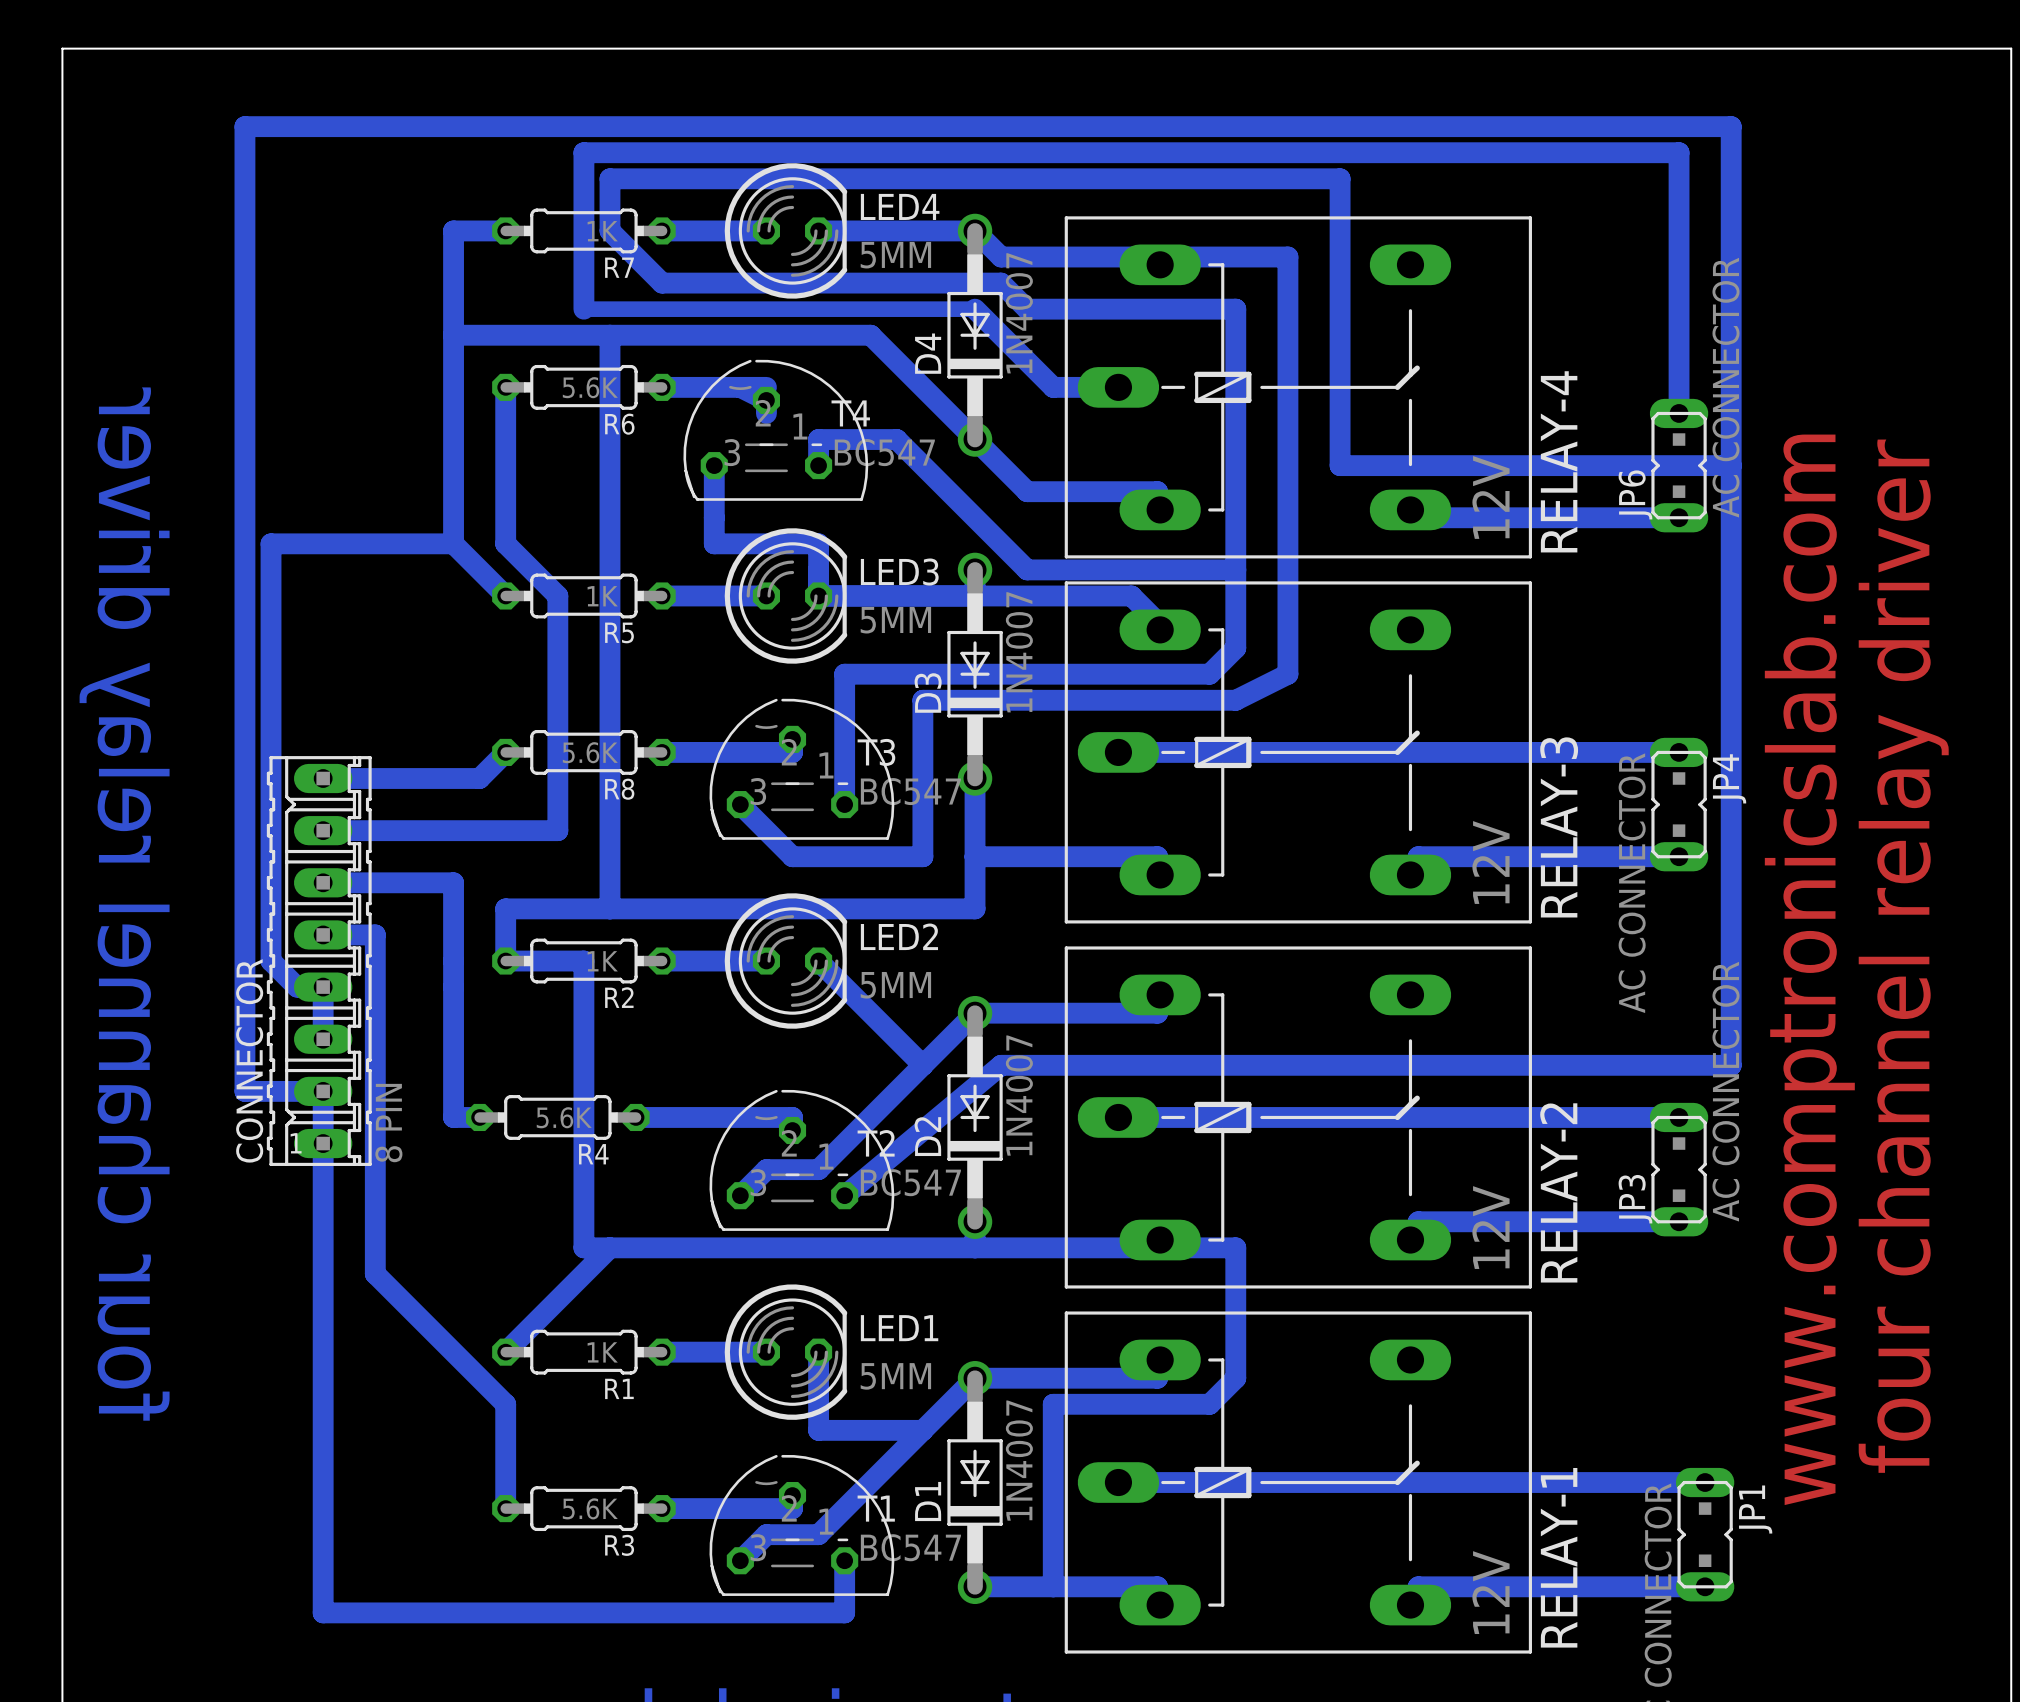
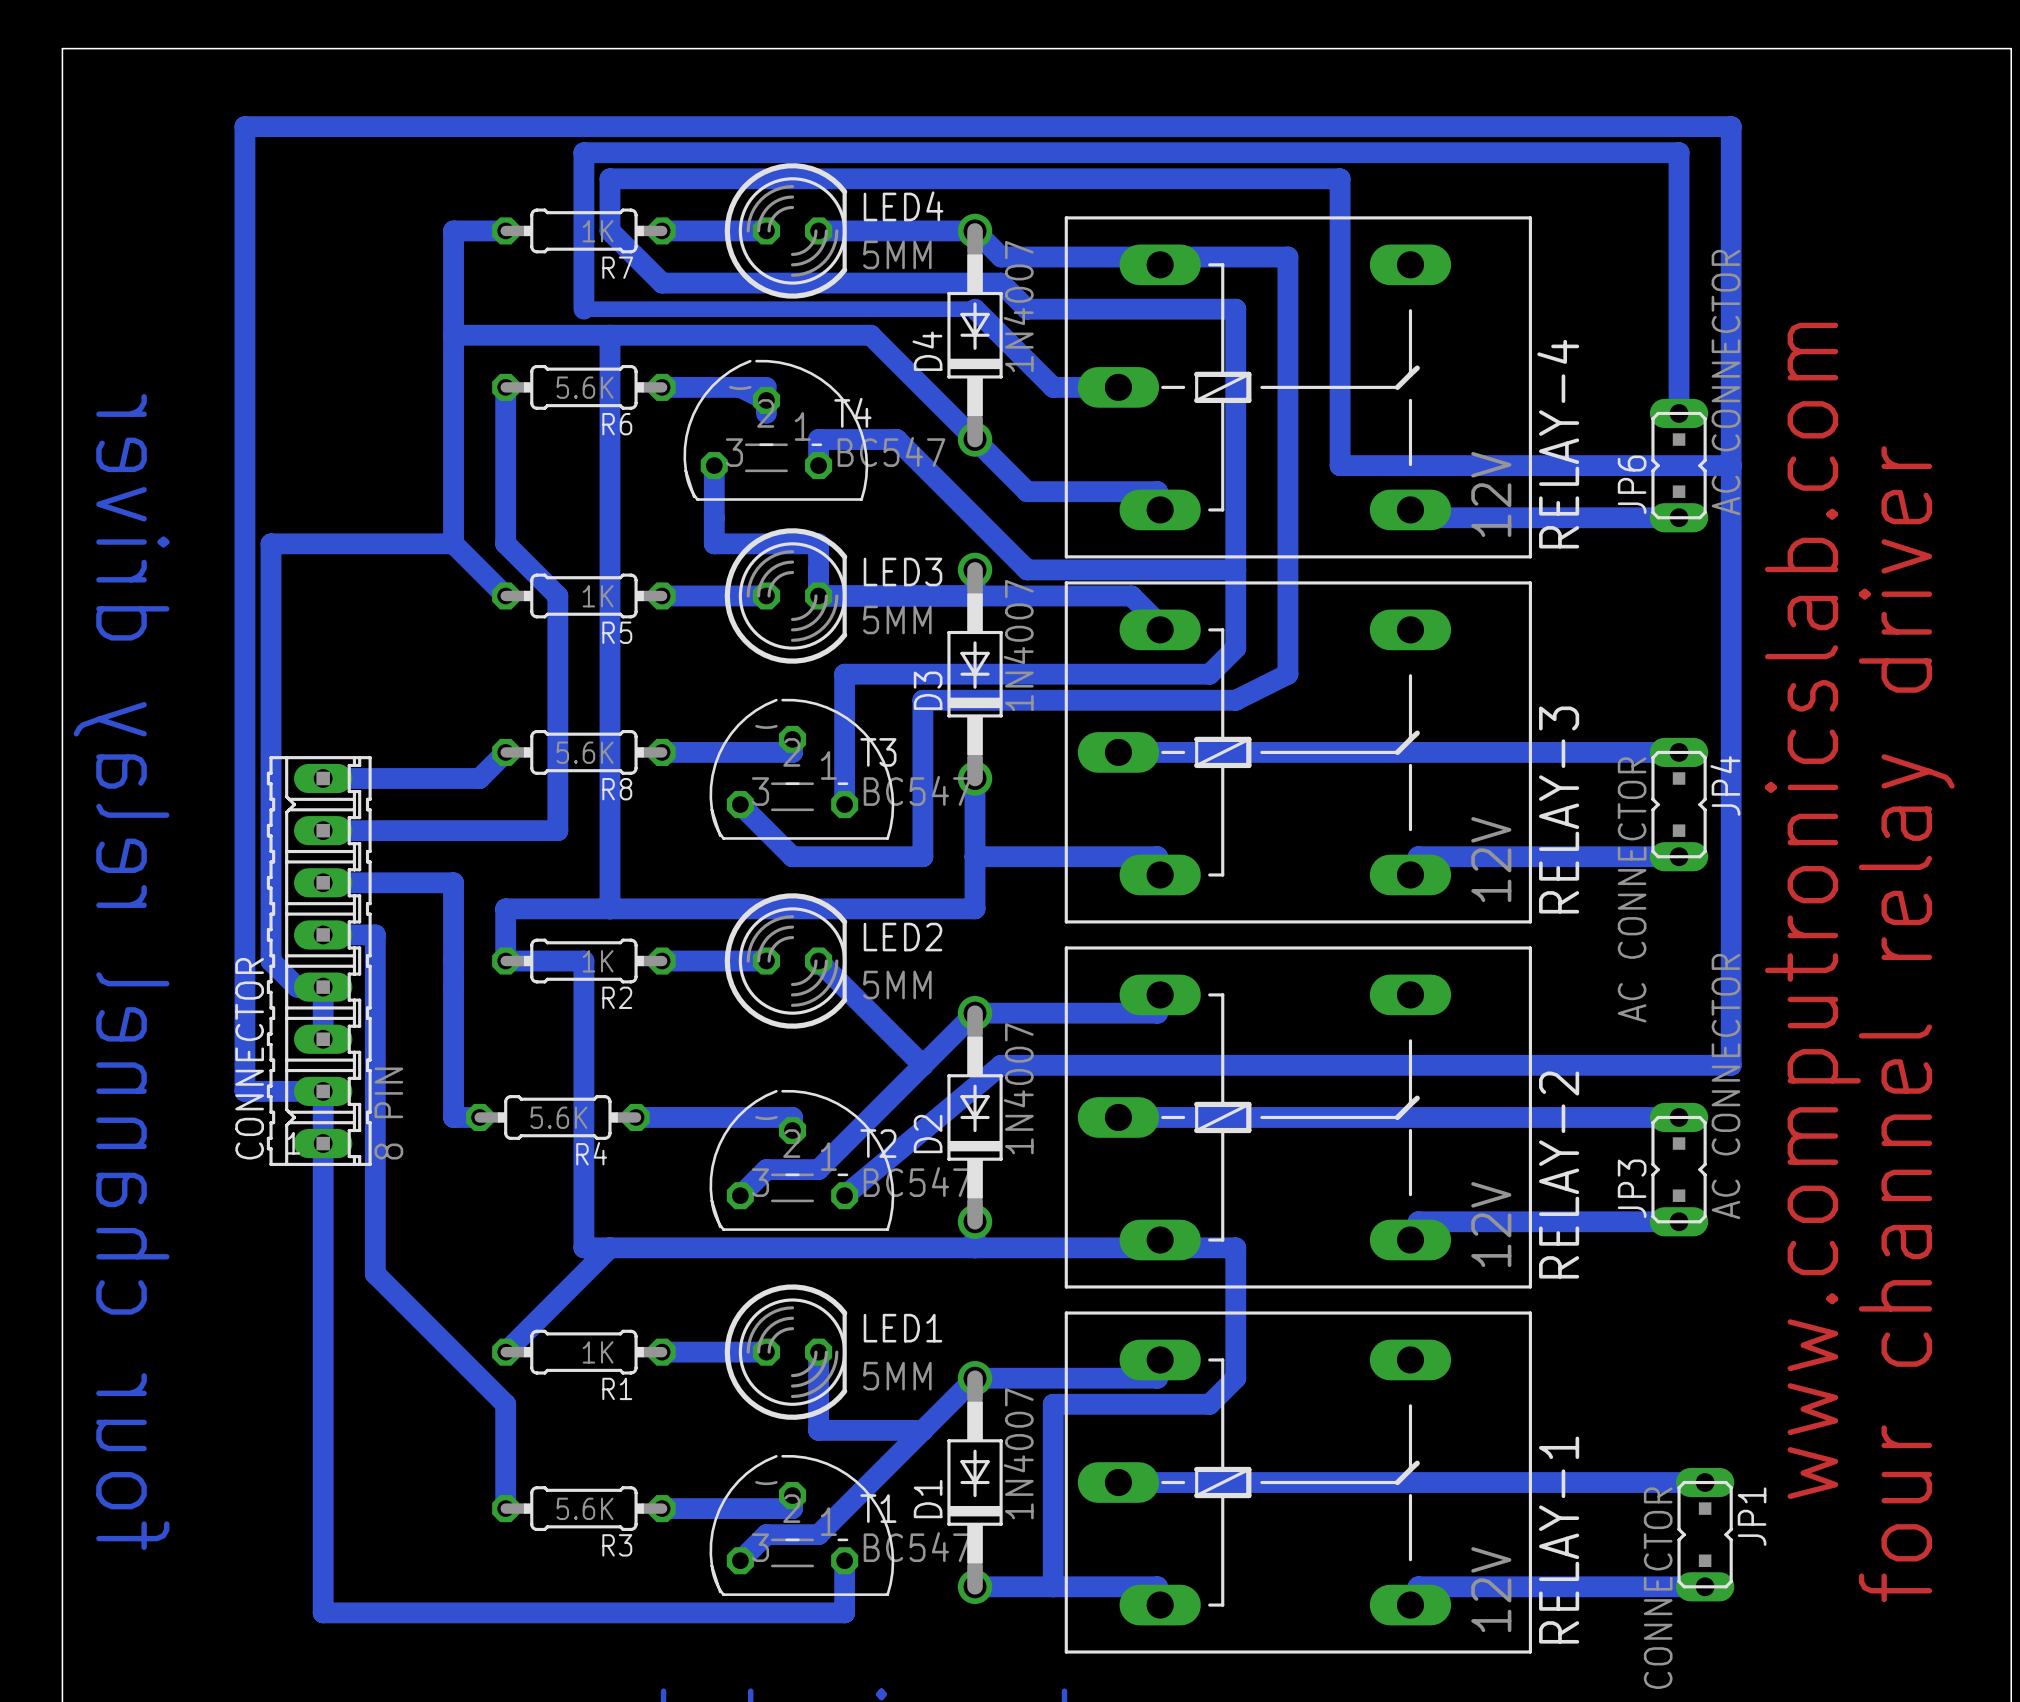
text: www.comptronicslab.com (1809, 969) -> www.computronicslab.com (1812, 910)

